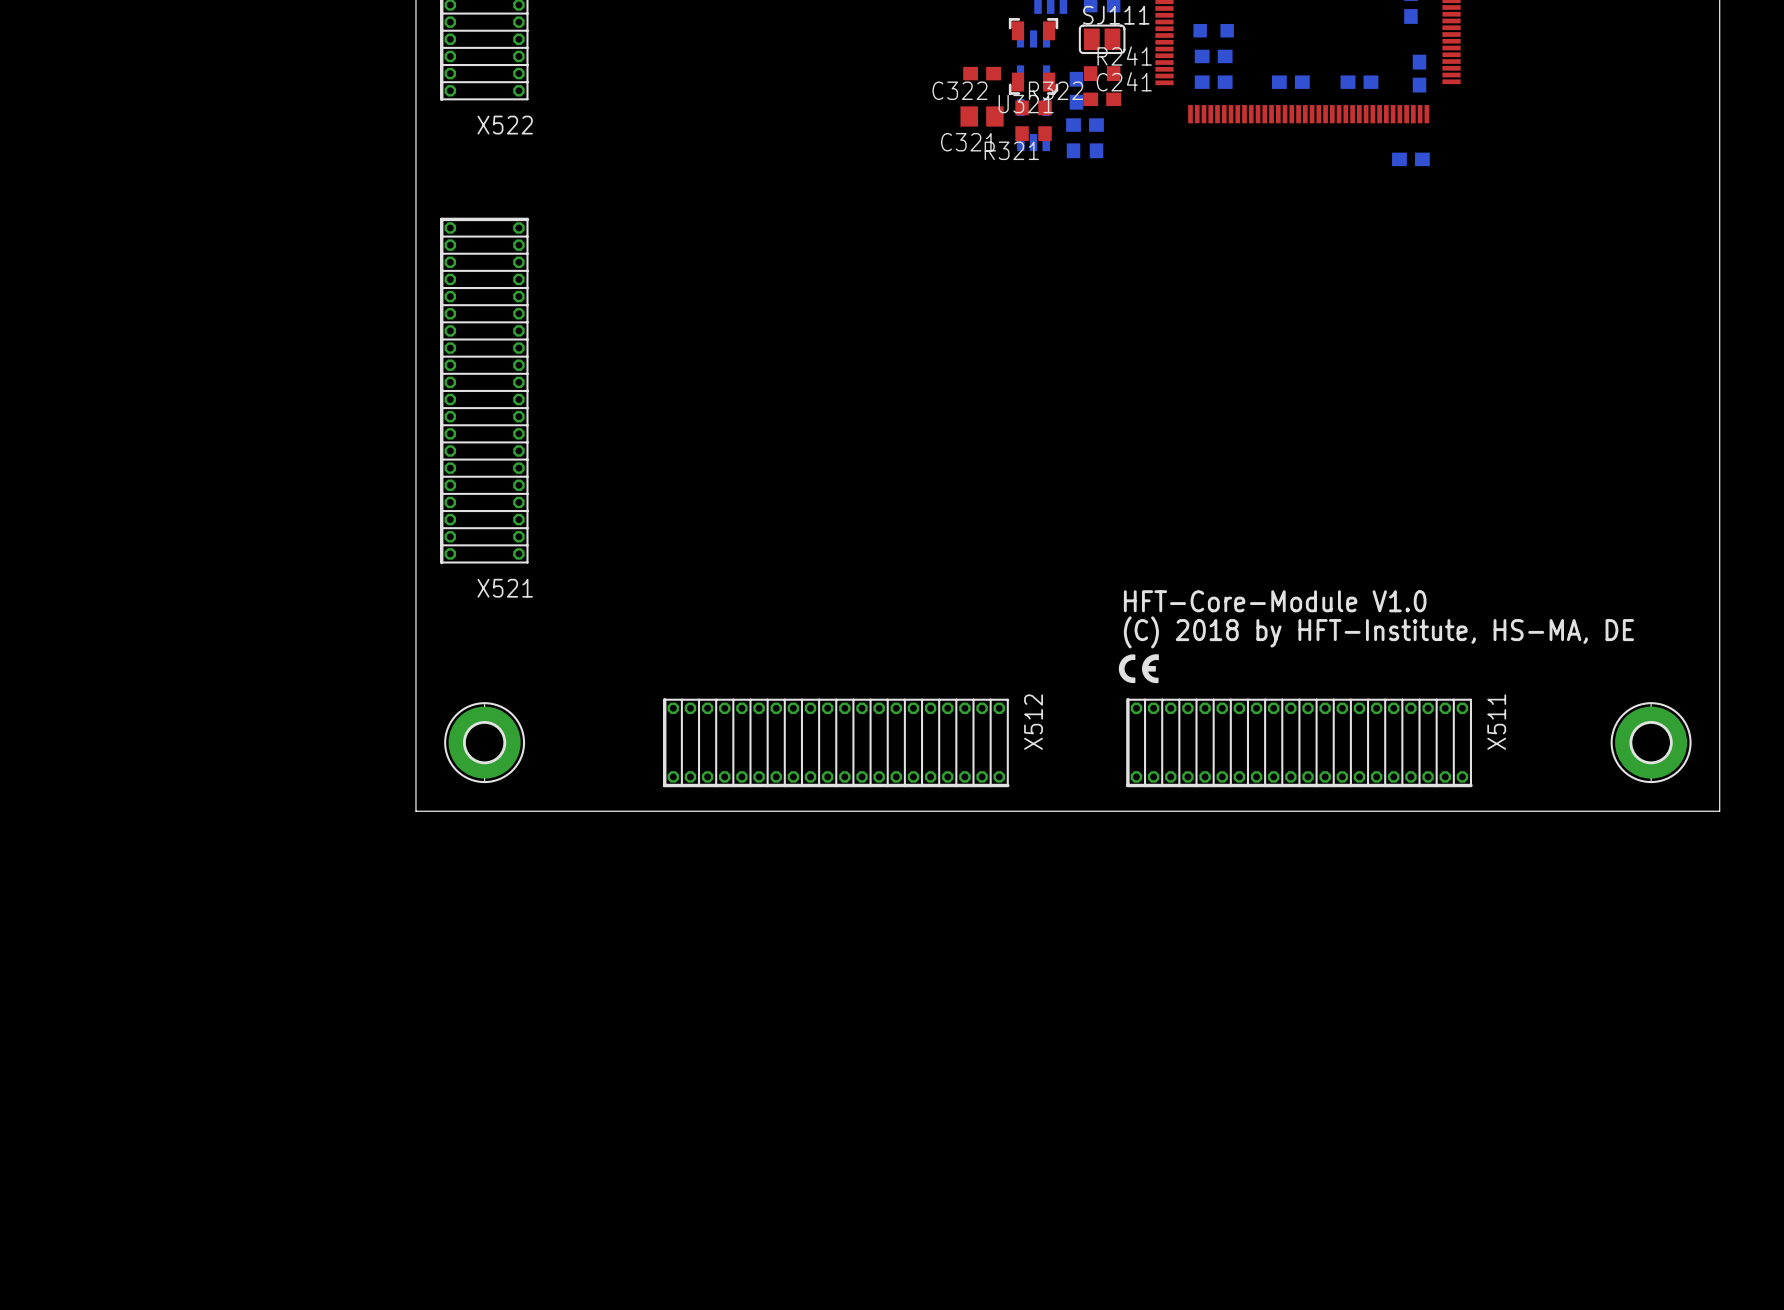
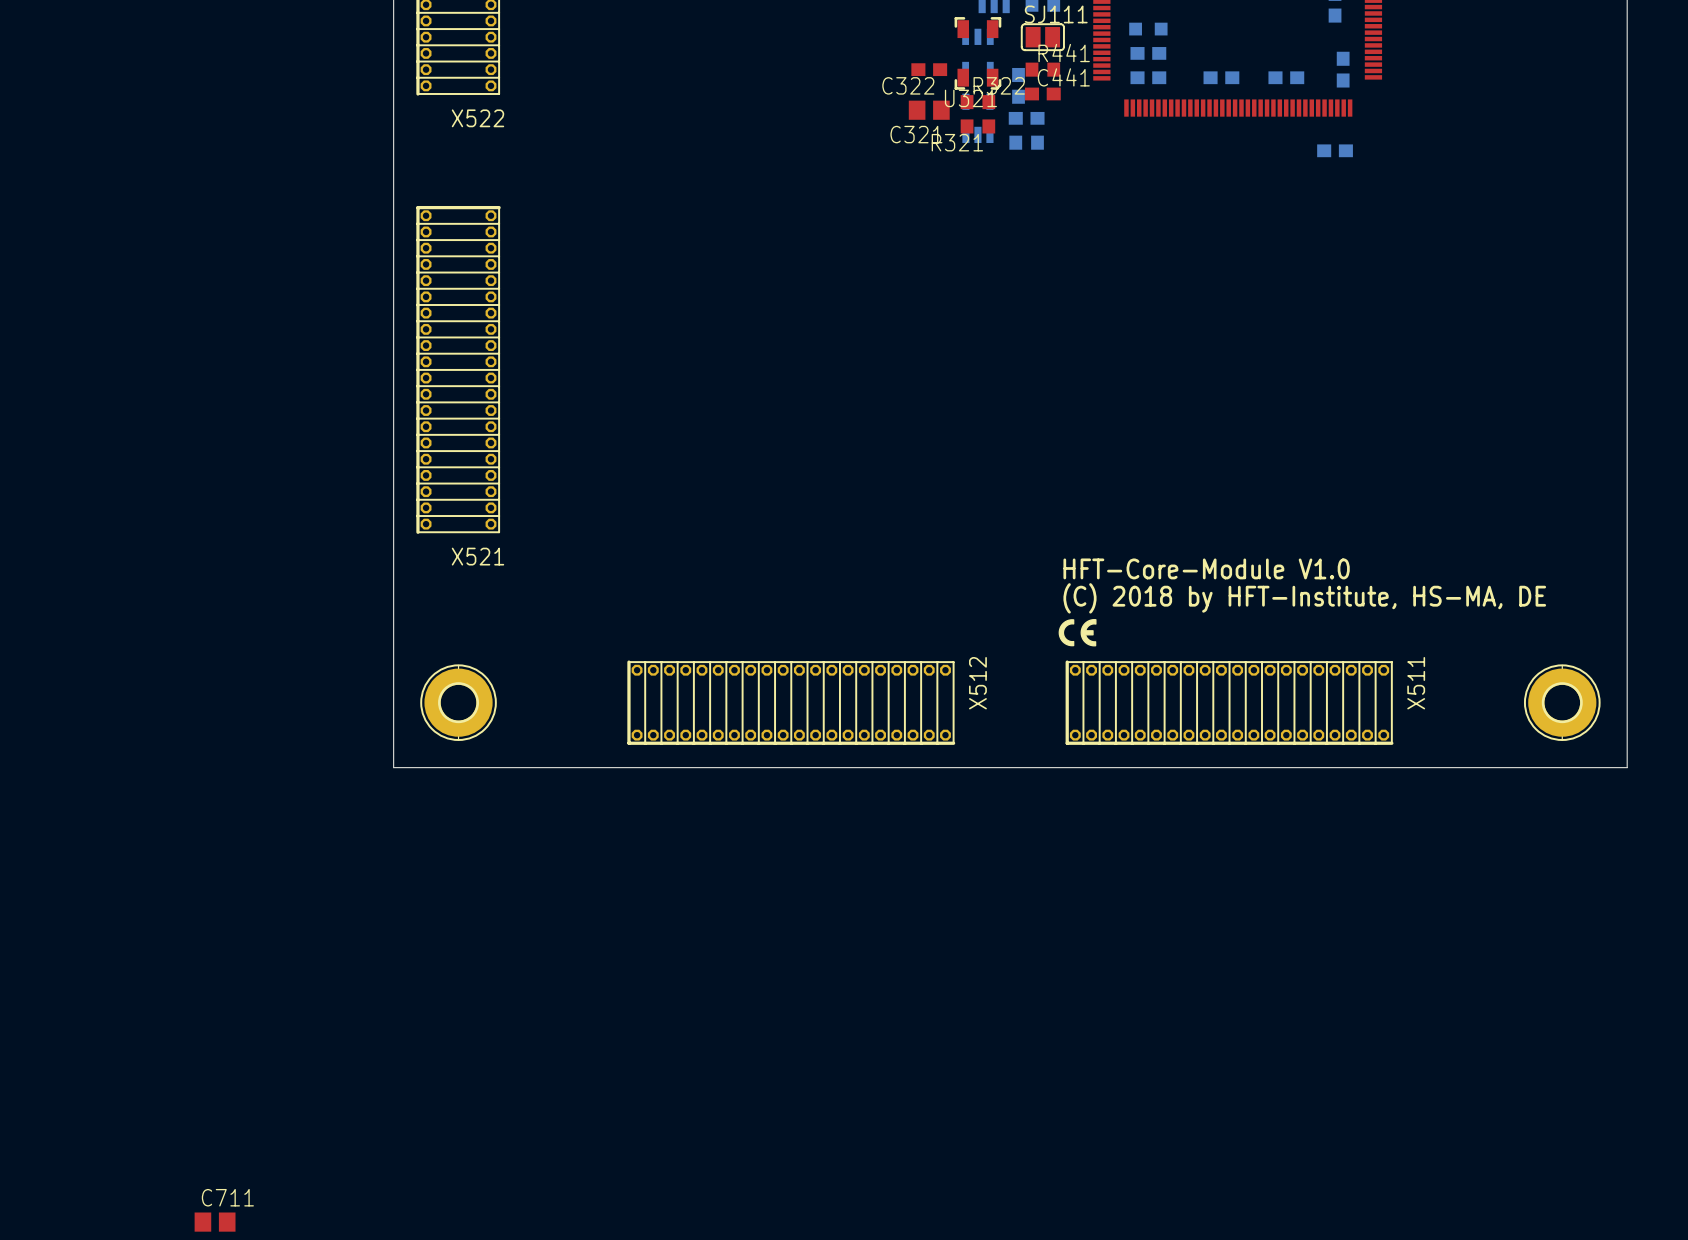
R241 name: R241 (1124, 56) -> R441 (1064, 53)
C241 name: C241 (1124, 81) -> C441 (1063, 77)
C711: none -> (215, 1222)

